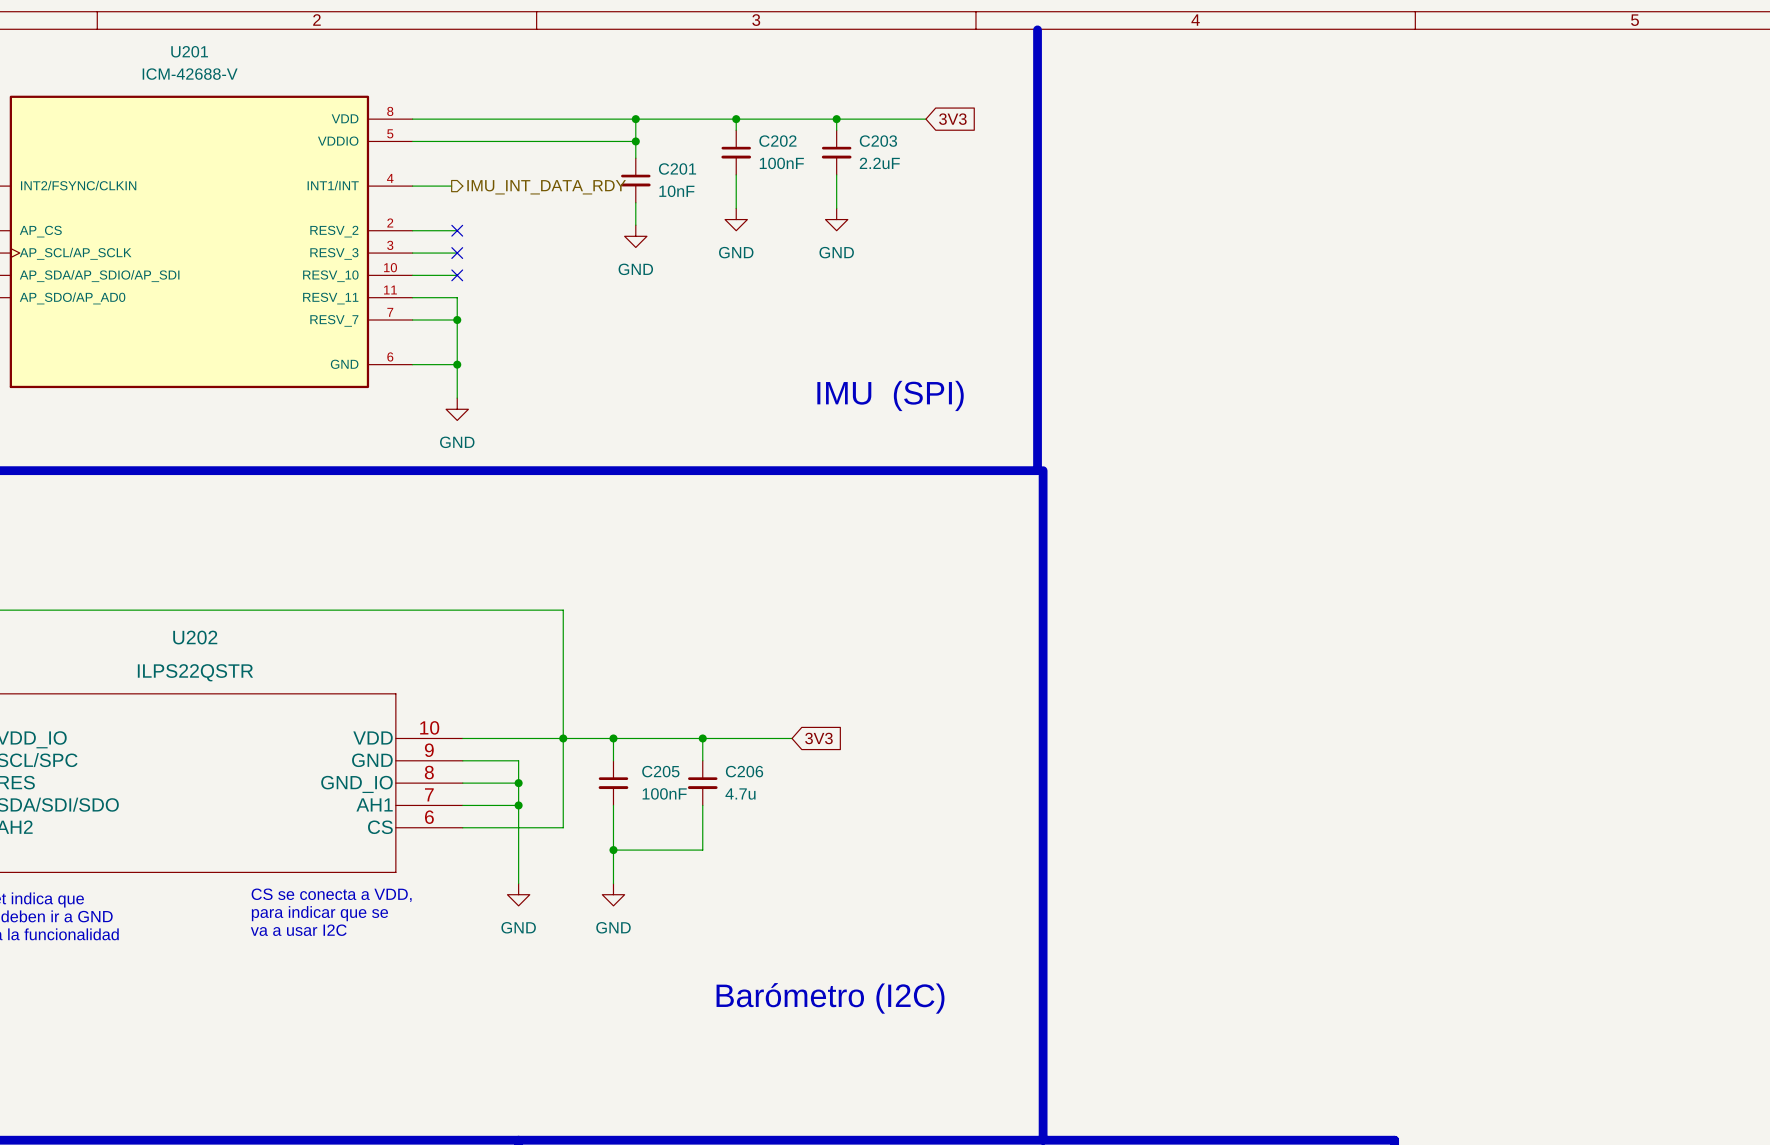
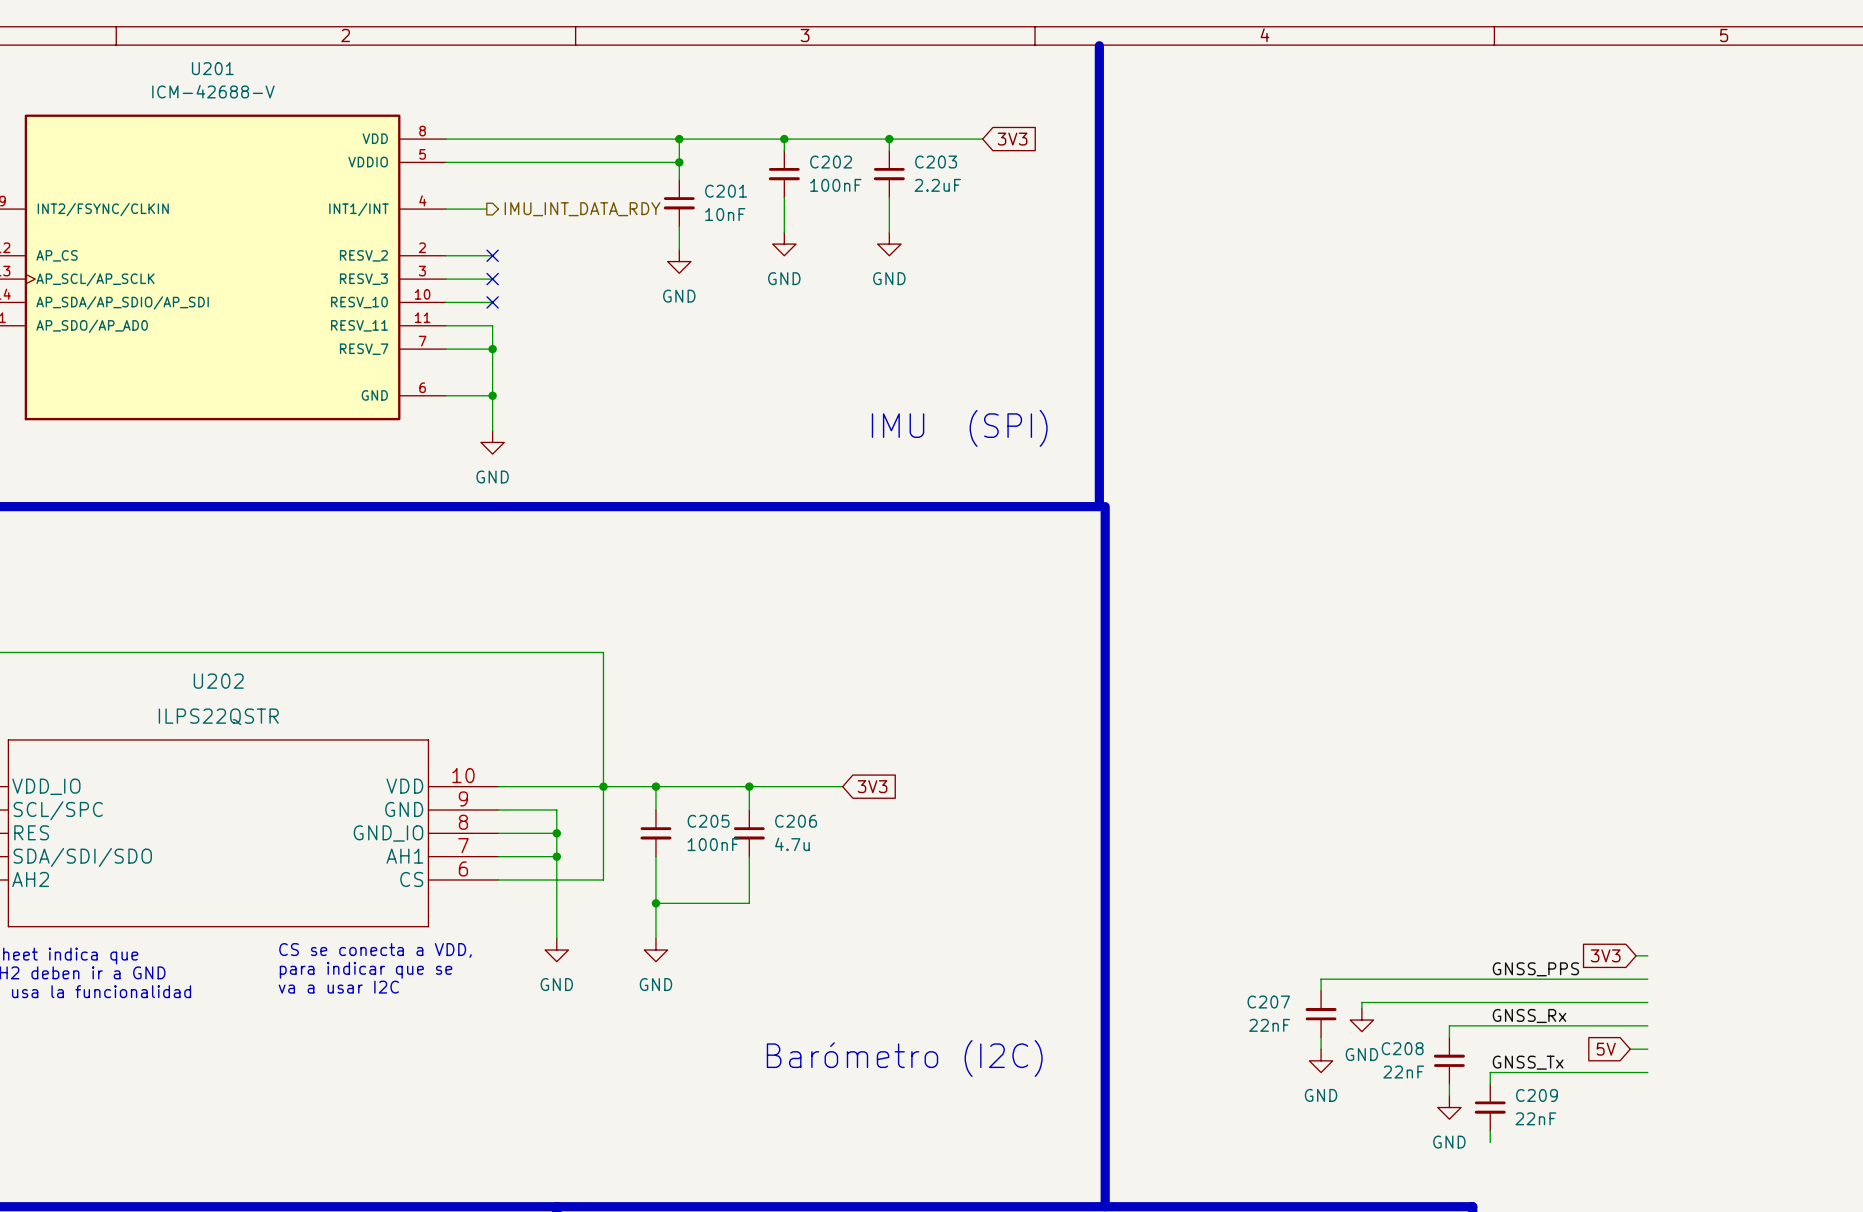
global label: none -> 3V3 (1605, 955)
wire: none -> (1636, 955) (1647, 955)
label: none -> GNSS_PPS (1535, 969)
wire: none -> (1647, 979) (1321, 979) (1321, 990)
wire: none -> (1647, 1002) (1361, 1002) (1361, 1008)
C207: none -> 22nF (1321, 1014)
label: none -> GNSS_Rx (1529, 1015)
power symbol: none -> GND (1361, 1020)
wire: none -> (1647, 1025) (1449, 1025) (1449, 1037)
wire: none -> (1321, 1037) (1321, 1049)
global label: none -> 5V (1606, 1049)
wire: none -> (1630, 1049) (1647, 1049)
power symbol: none -> GND (1321, 1060)
C208: none -> 22nF (1449, 1060)
label: none -> GNSS_Tx (1528, 1062)
wire: none -> (1647, 1072) (1490, 1072) (1490, 1084)
wire: none -> (1449, 1084) (1449, 1095)
power symbol: none -> GND (1449, 1107)
C209: none -> 22nF (1490, 1107)
wire: none -> (1490, 1130) (1490, 1142)

